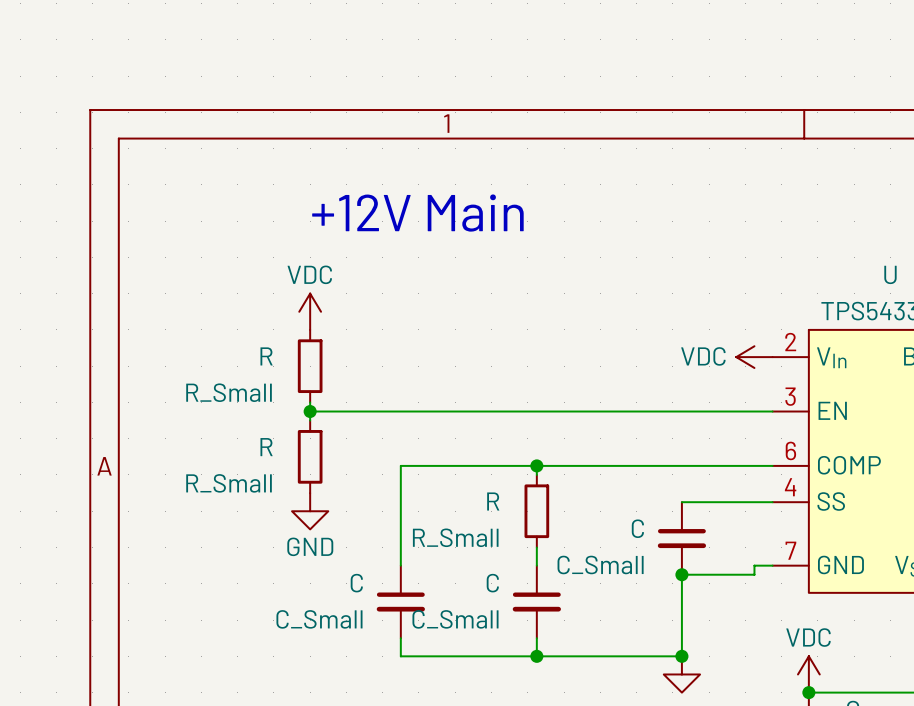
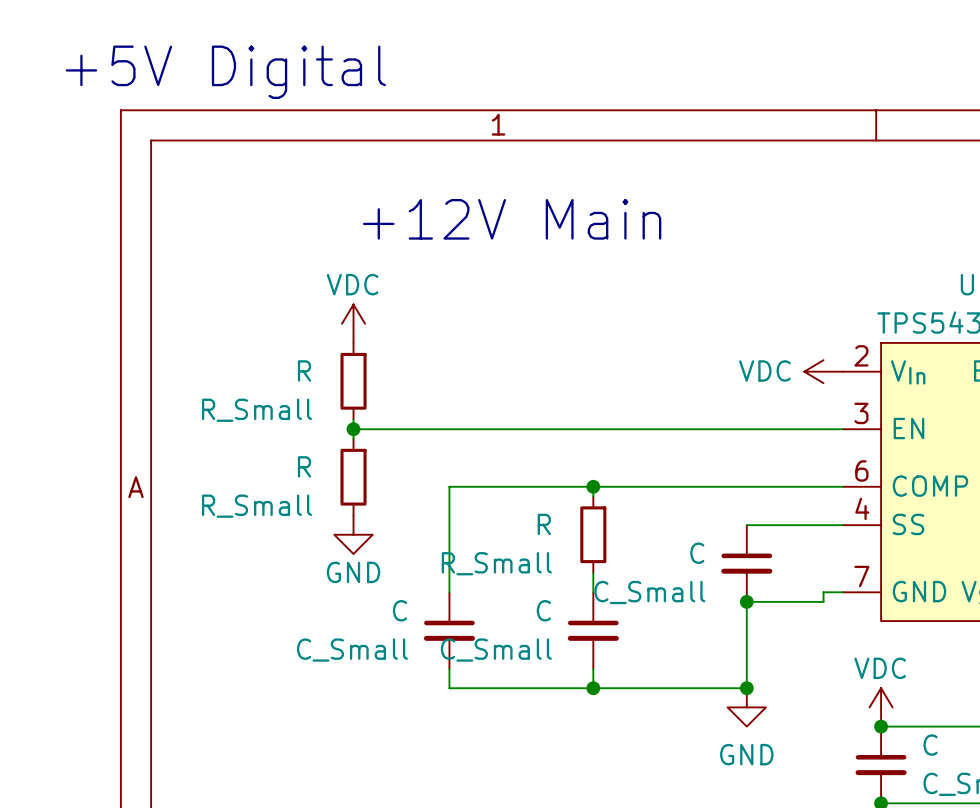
text: none -> +5V Digital (225, 72)

